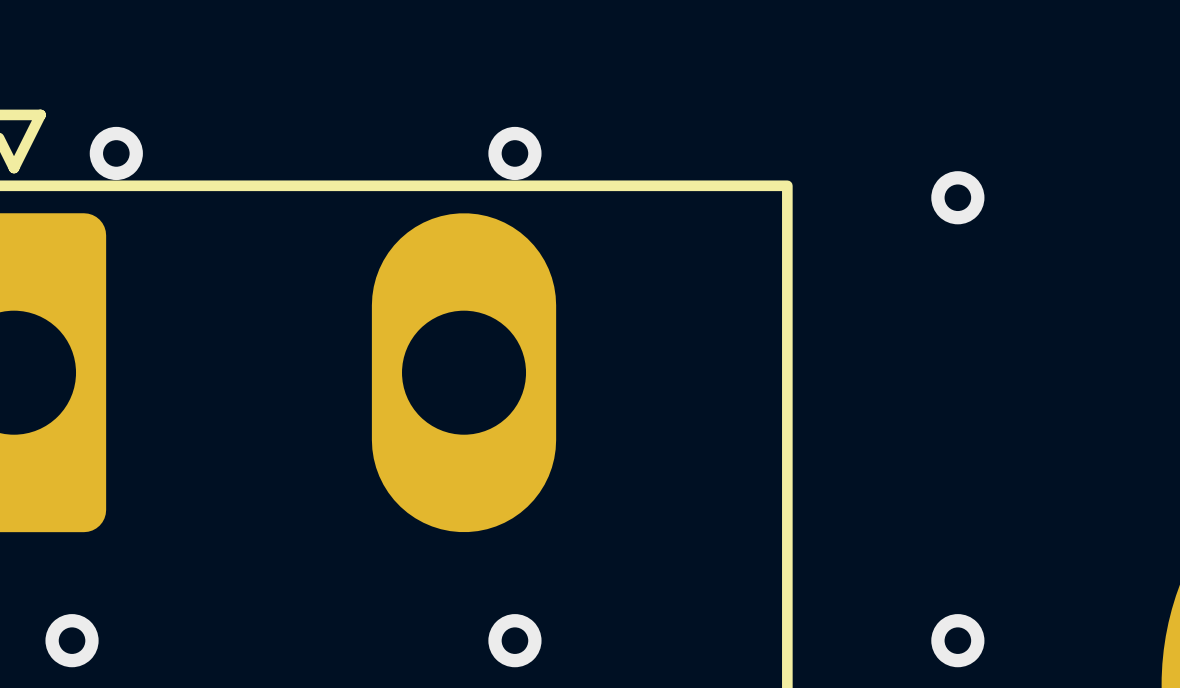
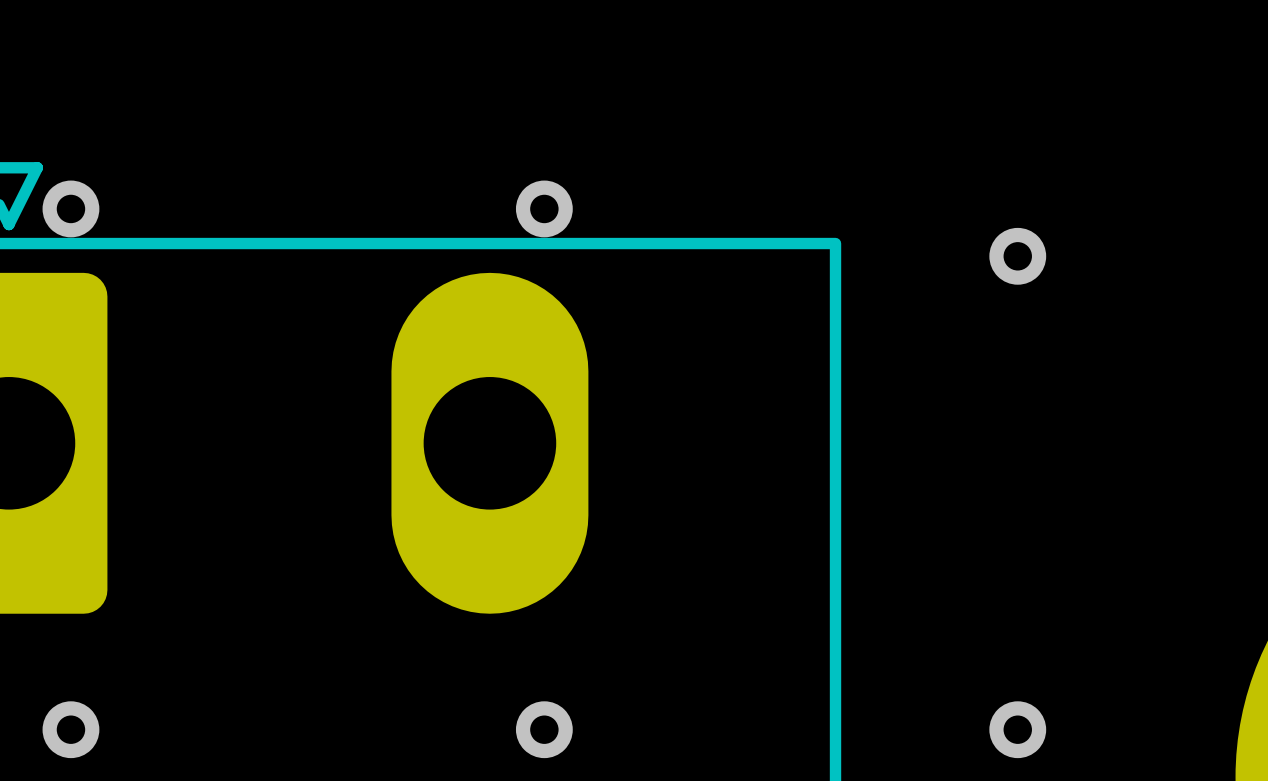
via position: (116, 153) -> (70, 208)

